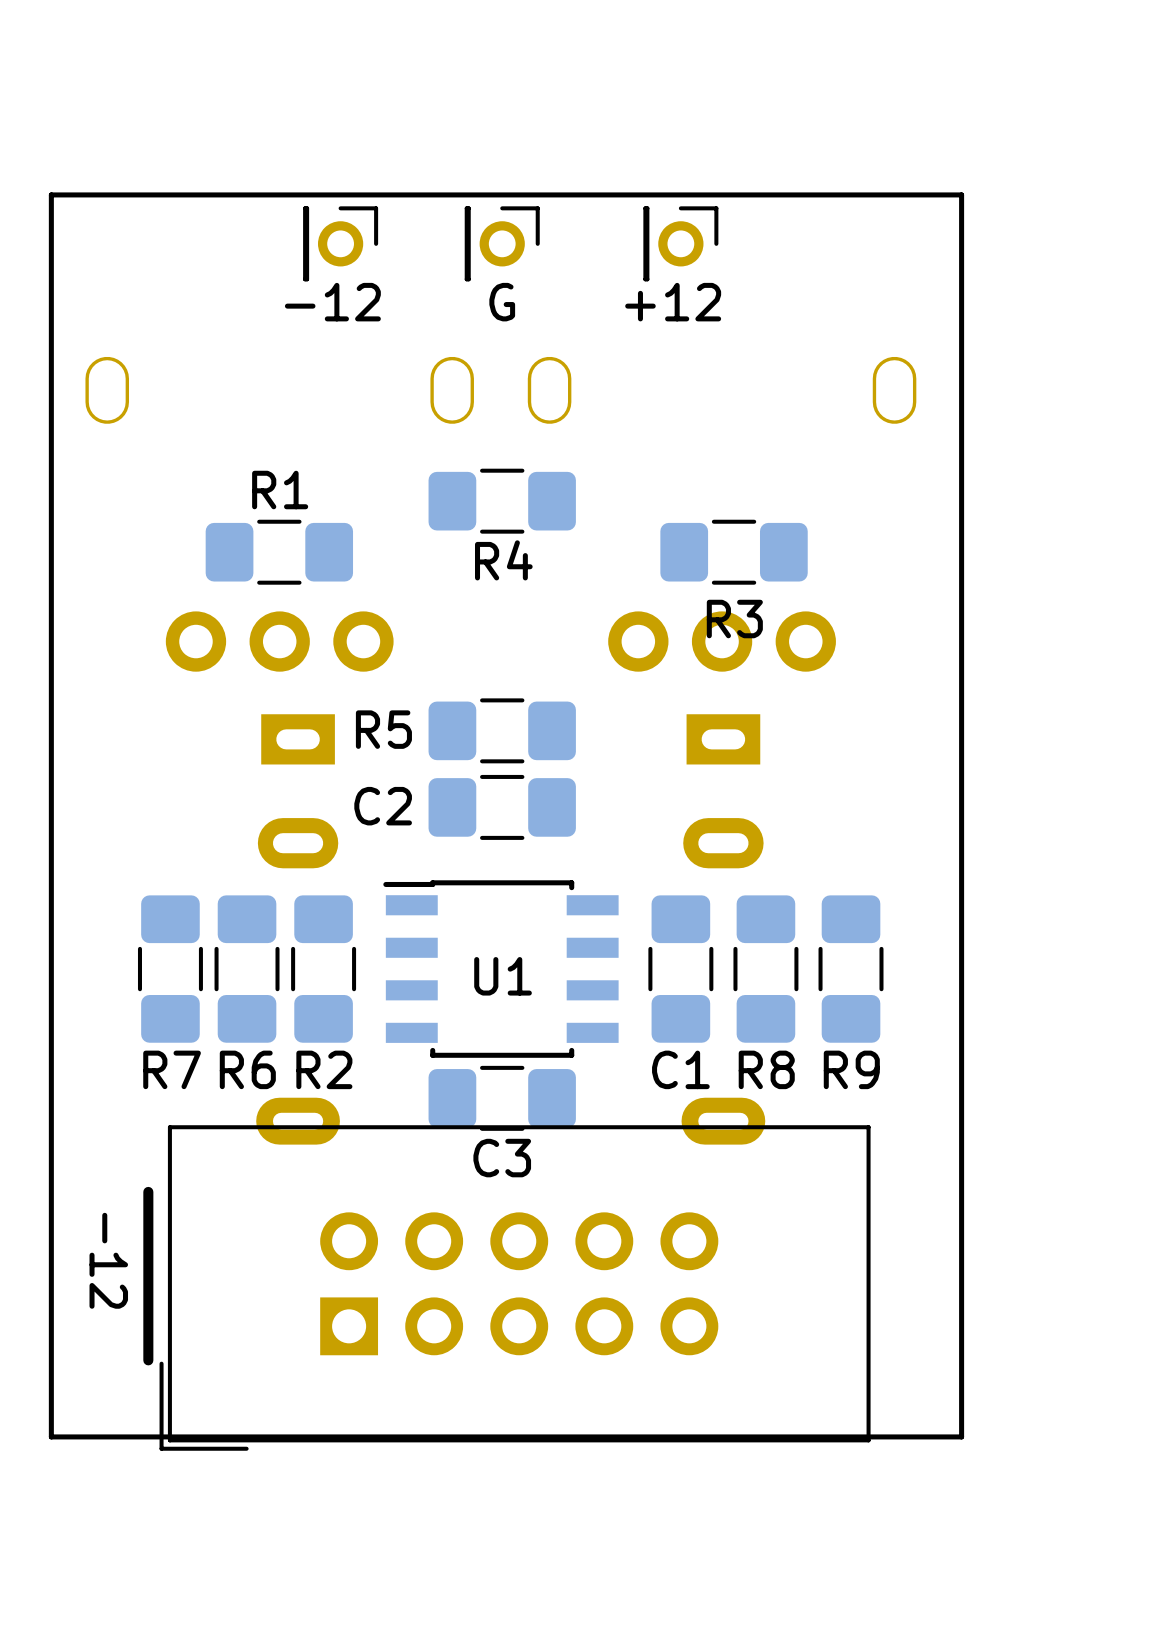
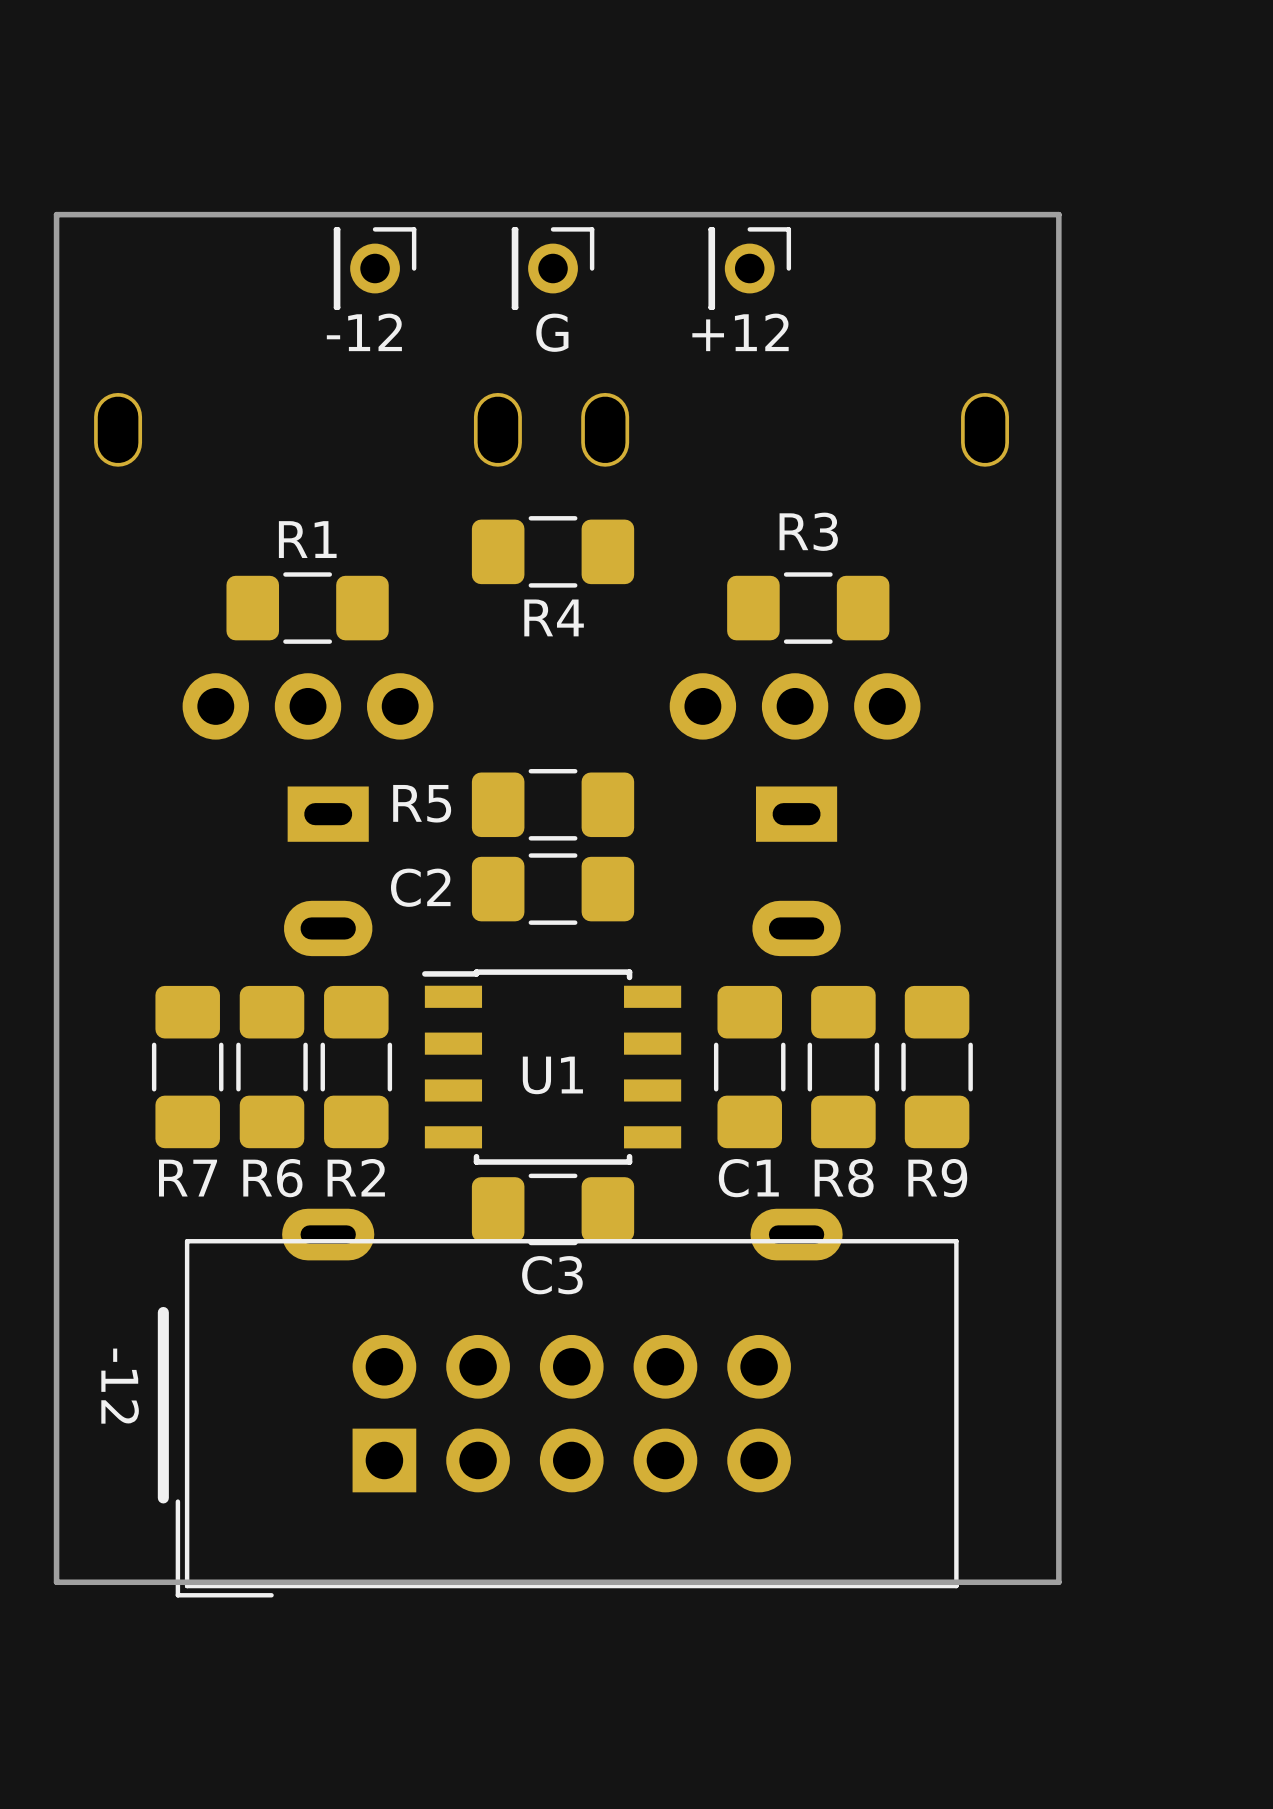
R3 name position: R3 (734, 619) -> R3 (808, 531)

